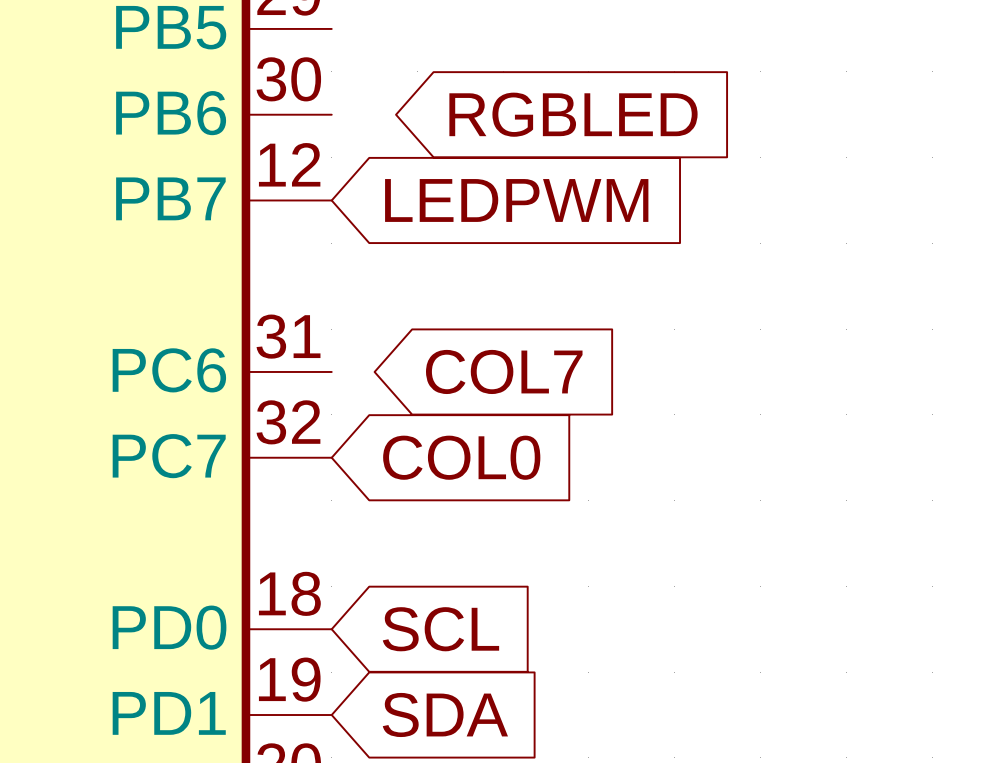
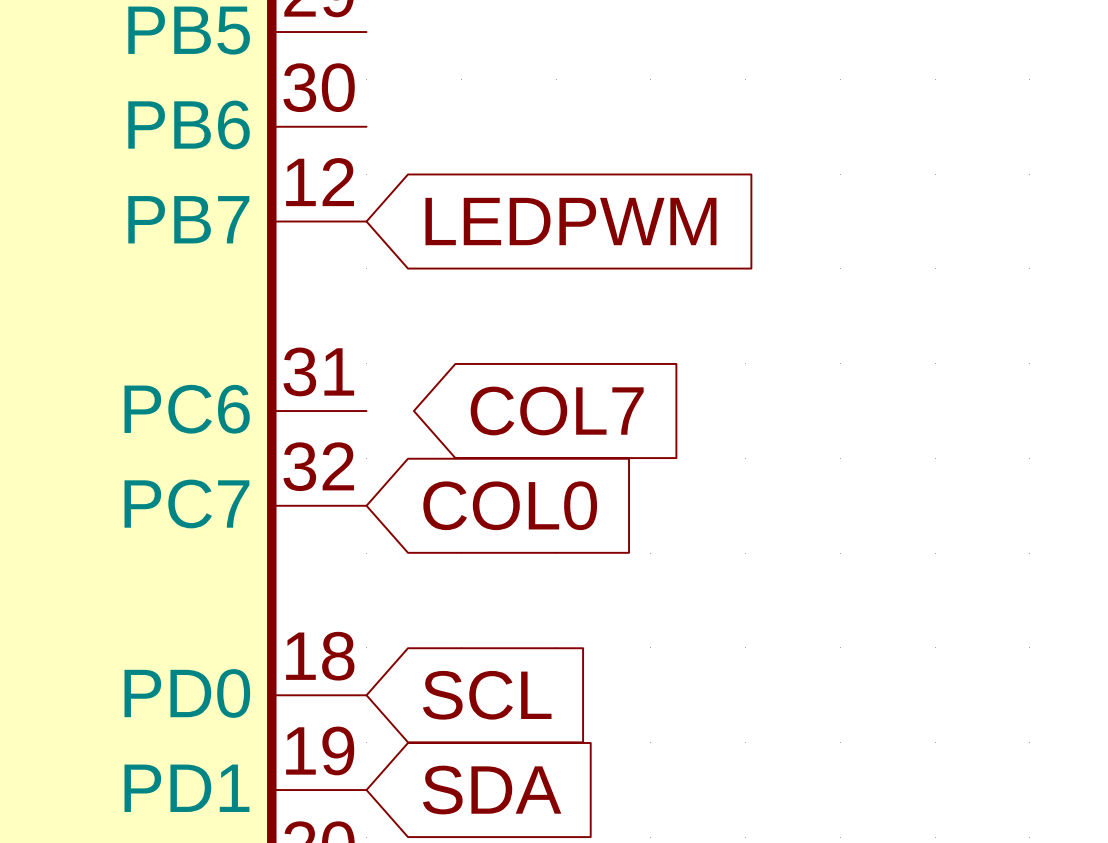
global label: RGBLED (573, 114) -> none

